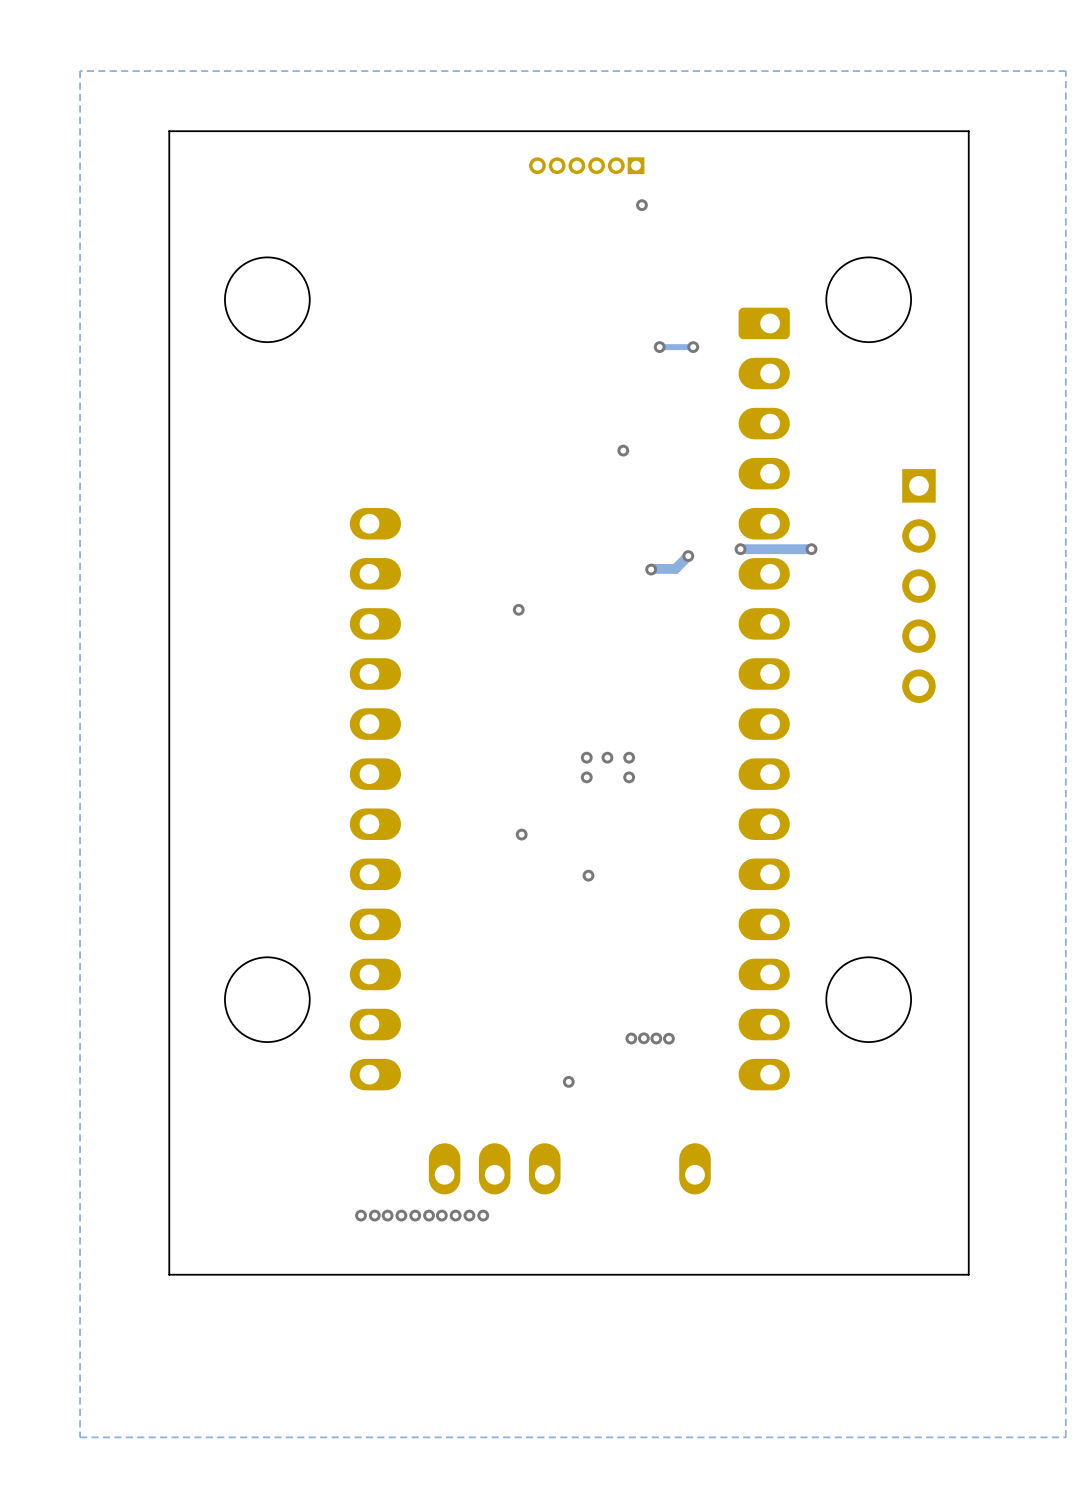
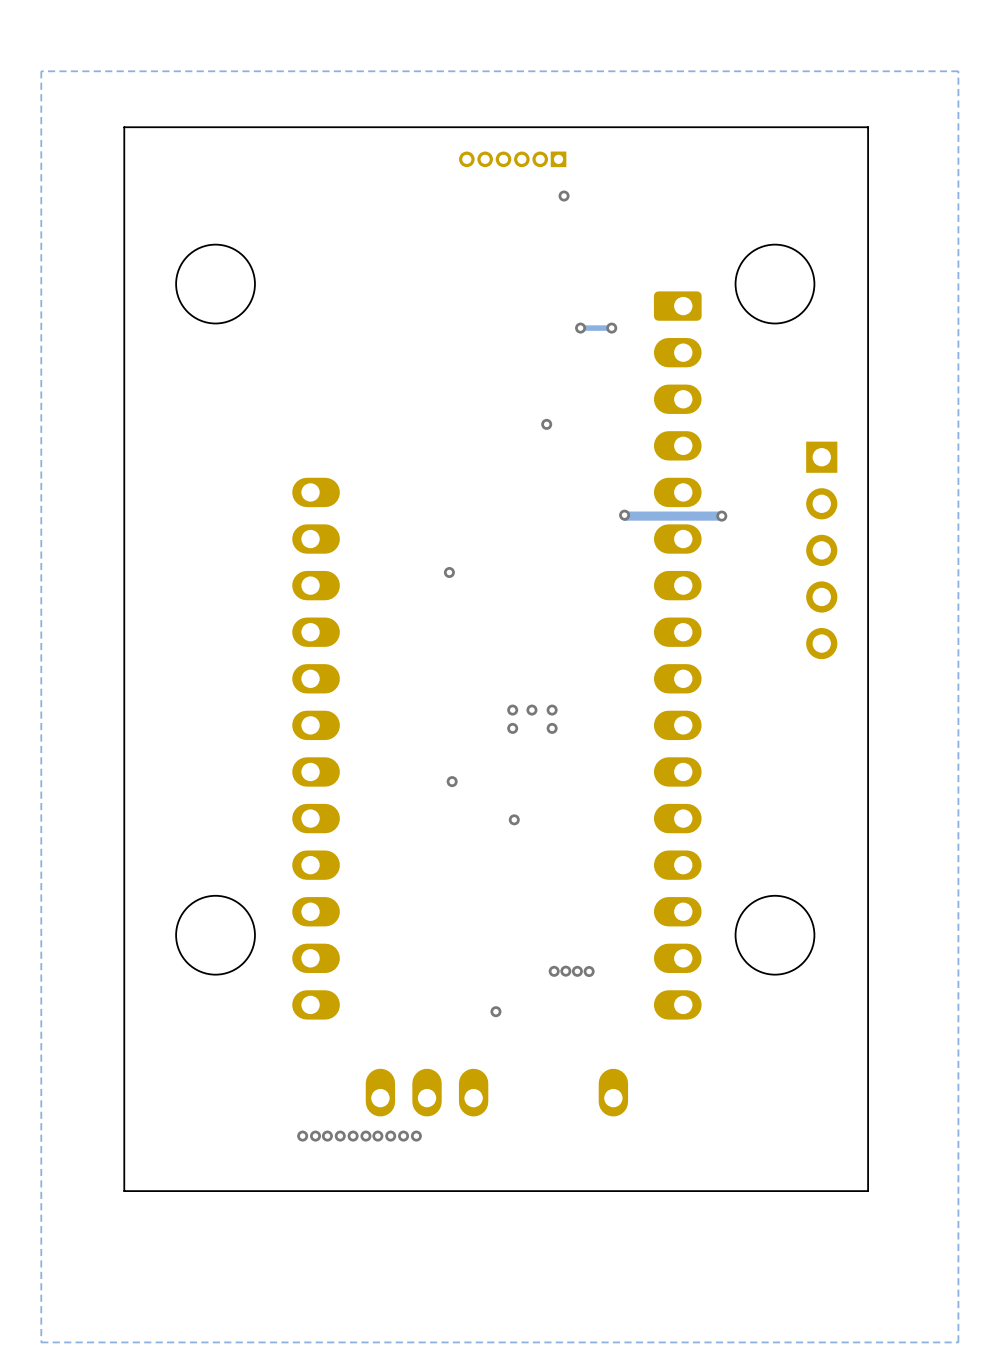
track: none -> (624, 515) (655, 516)
via: none -> (624, 515)
via: (740, 549) -> none
track: (688, 556) (675, 568) (651, 569) -> none
via: (688, 556) -> none
via: (651, 569) -> none

